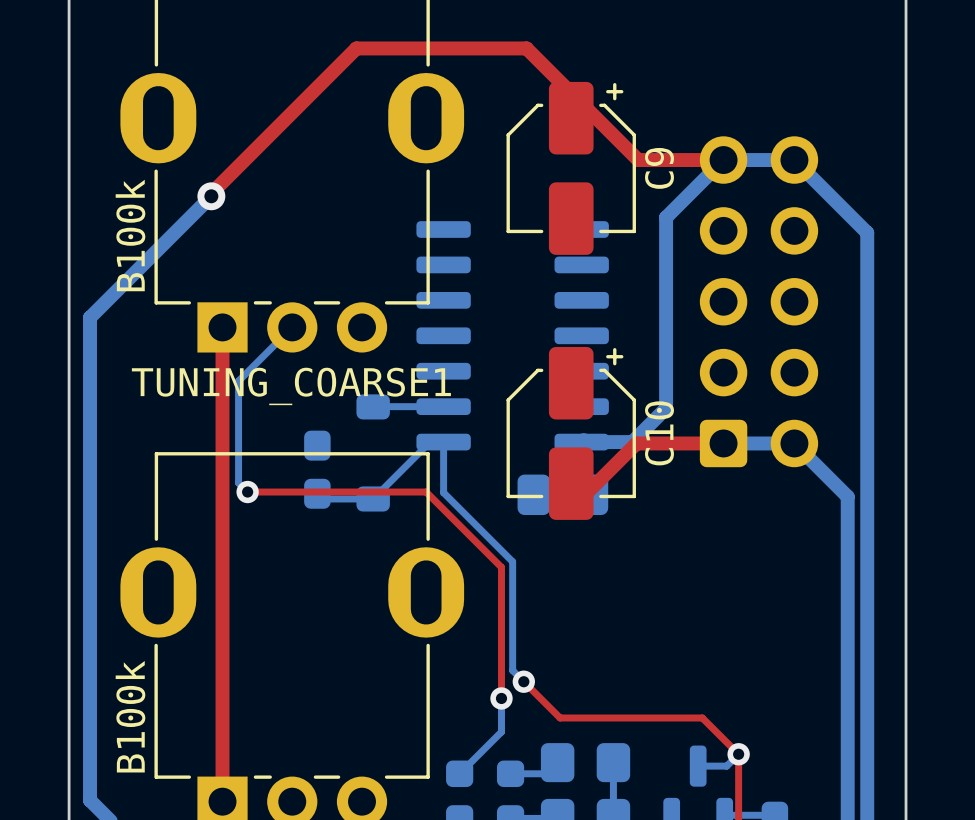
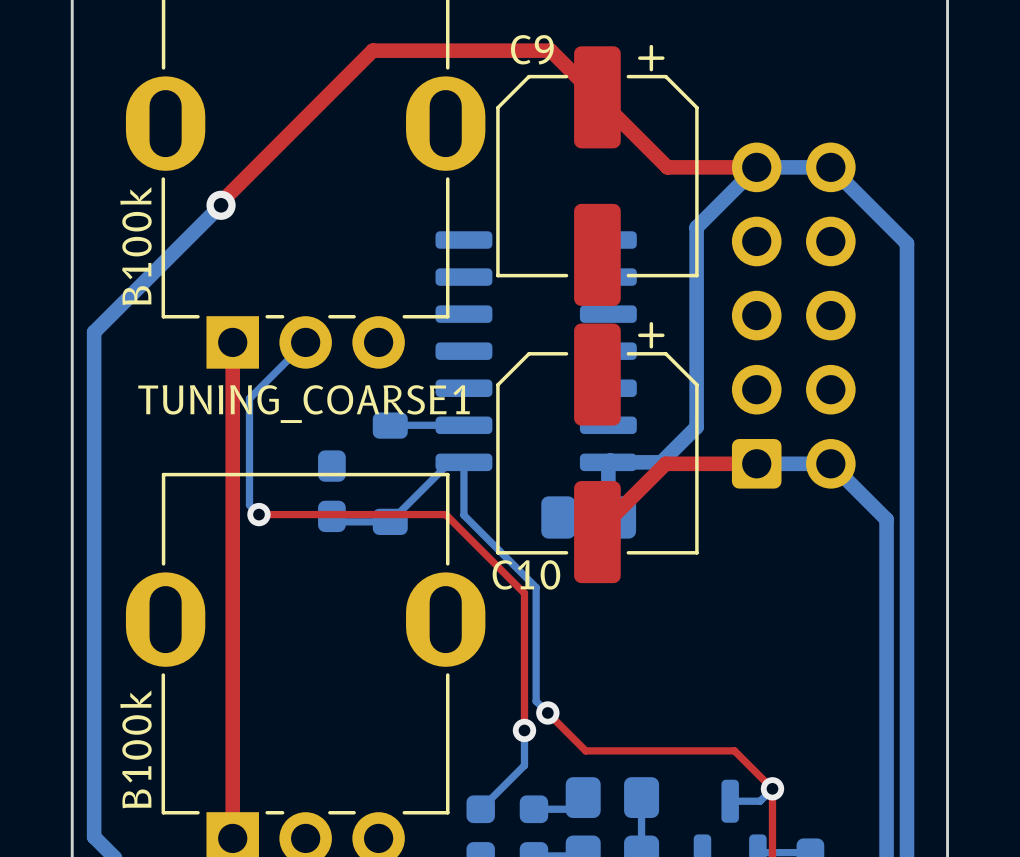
C9 footprint: [506, 81, 636, 255] -> [496, 44, 699, 306]
C9 name position: C9 (659, 168) -> C9 (532, 49)
C10 footprint: [506, 346, 636, 520] -> [496, 322, 699, 584]
C10 name position: C10 (659, 433) -> C10 (526, 574)

